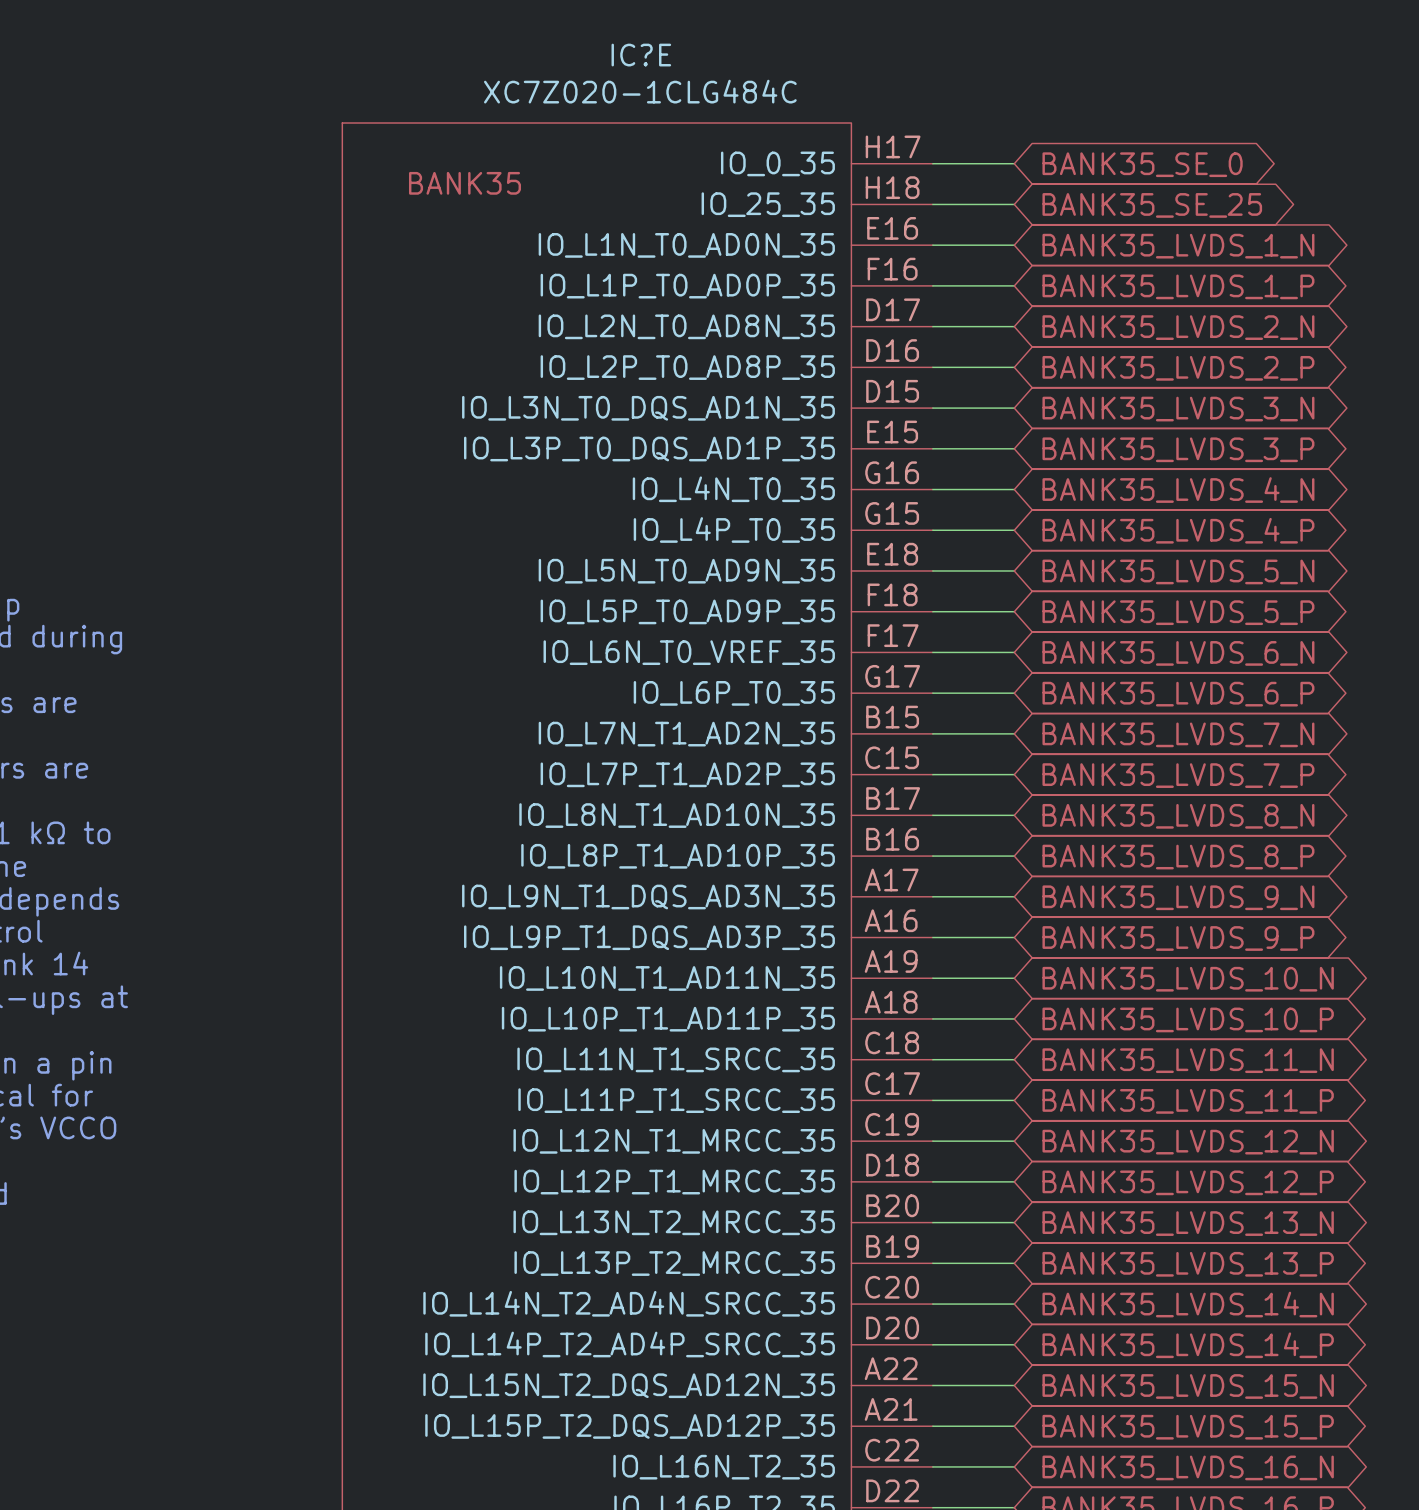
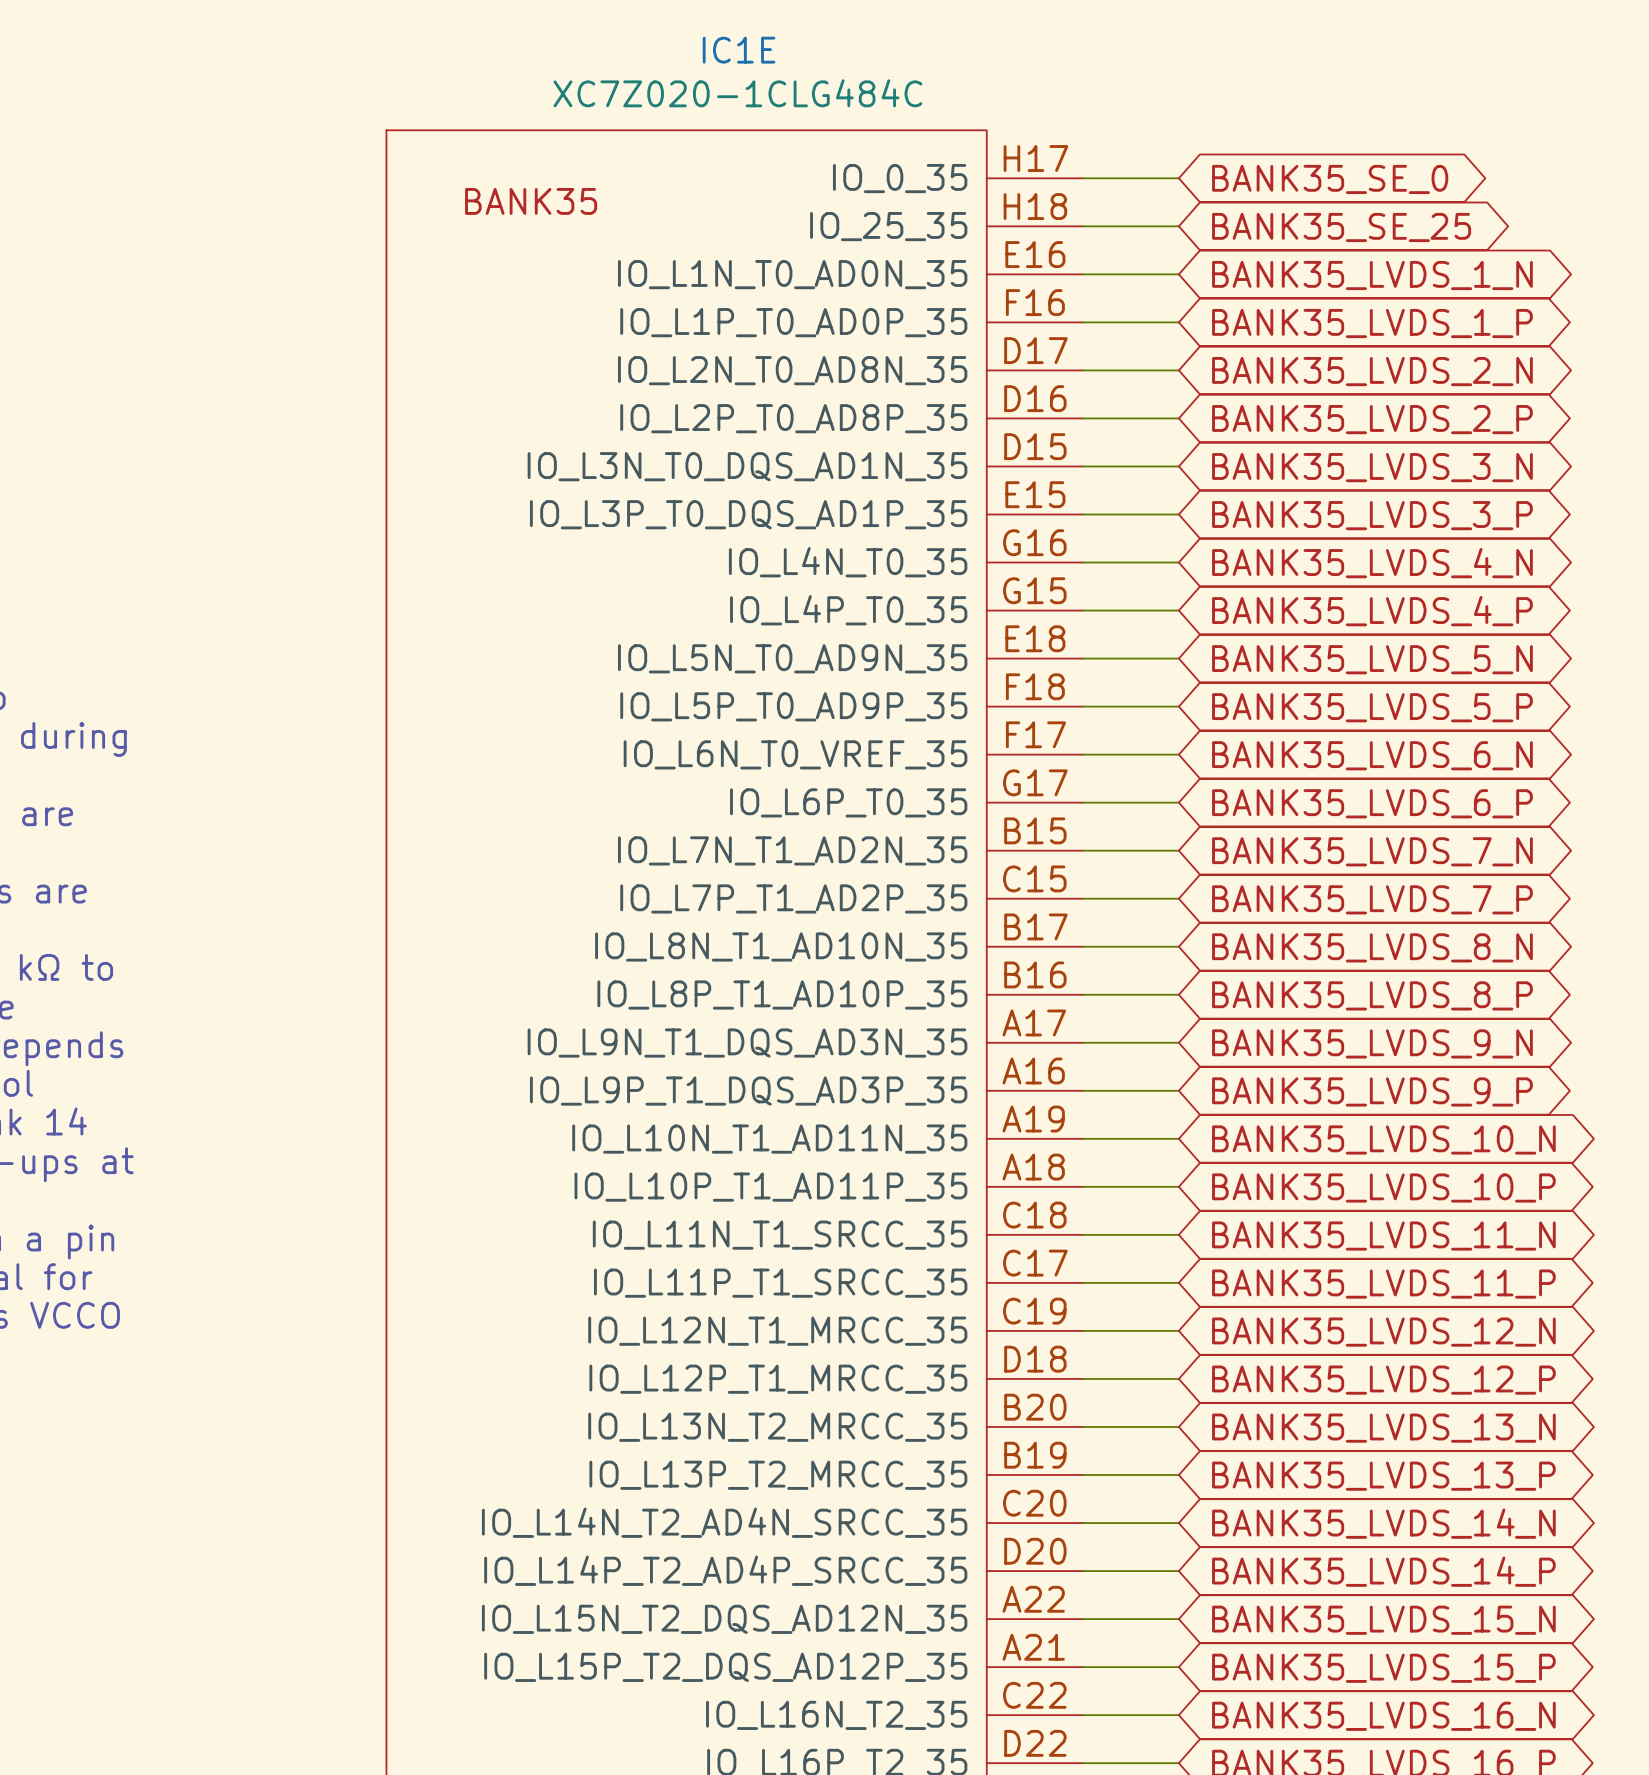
IC?E name: IC?E (641, 55) -> IC1E (739, 50)

